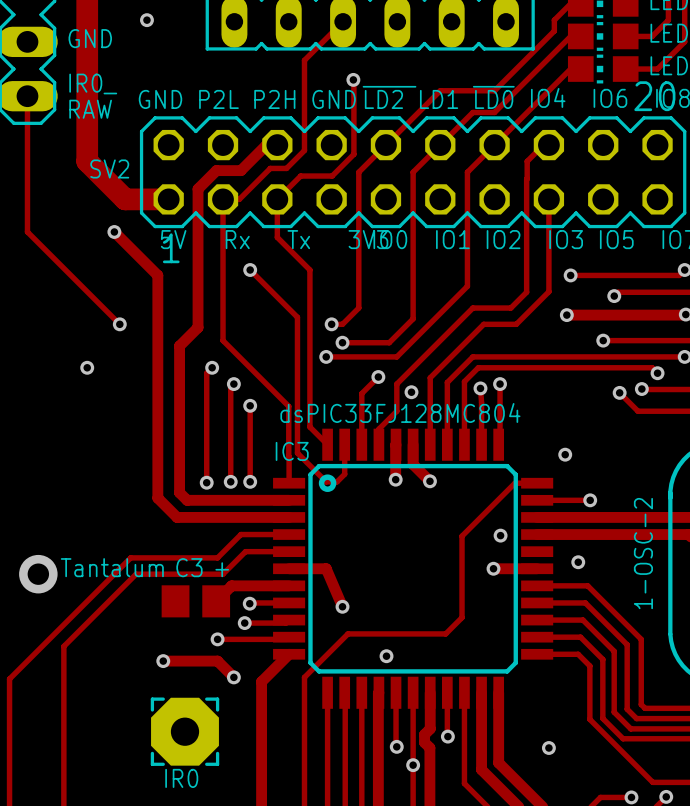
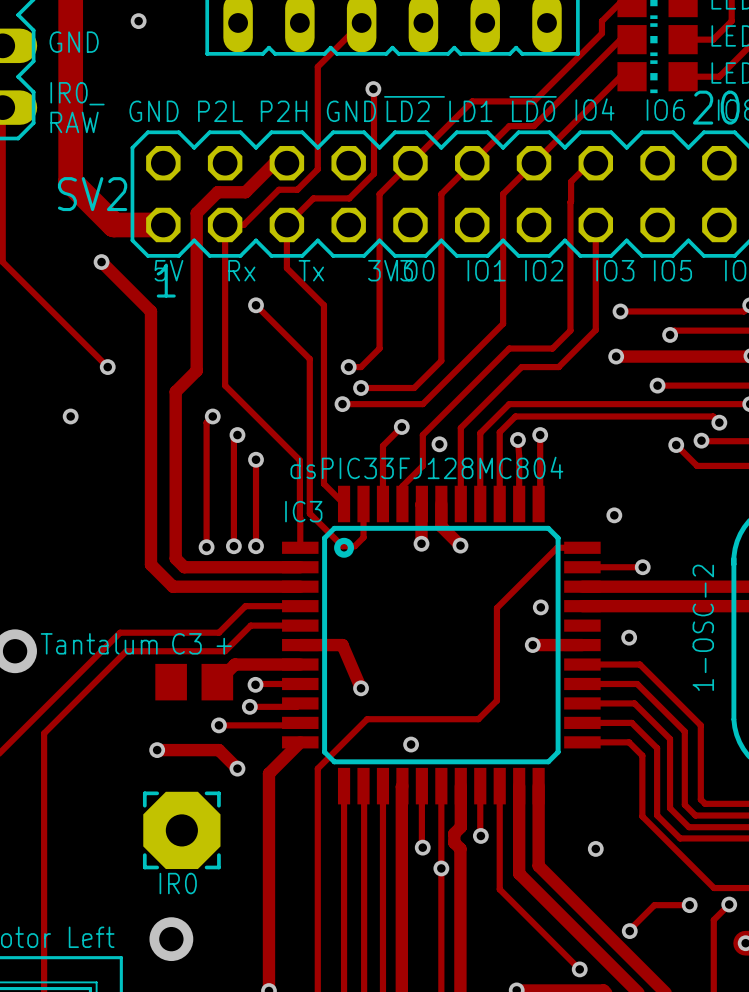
text: SV2 (109, 168) -> none
SV2 name: none -> SV2 (92, 194)

